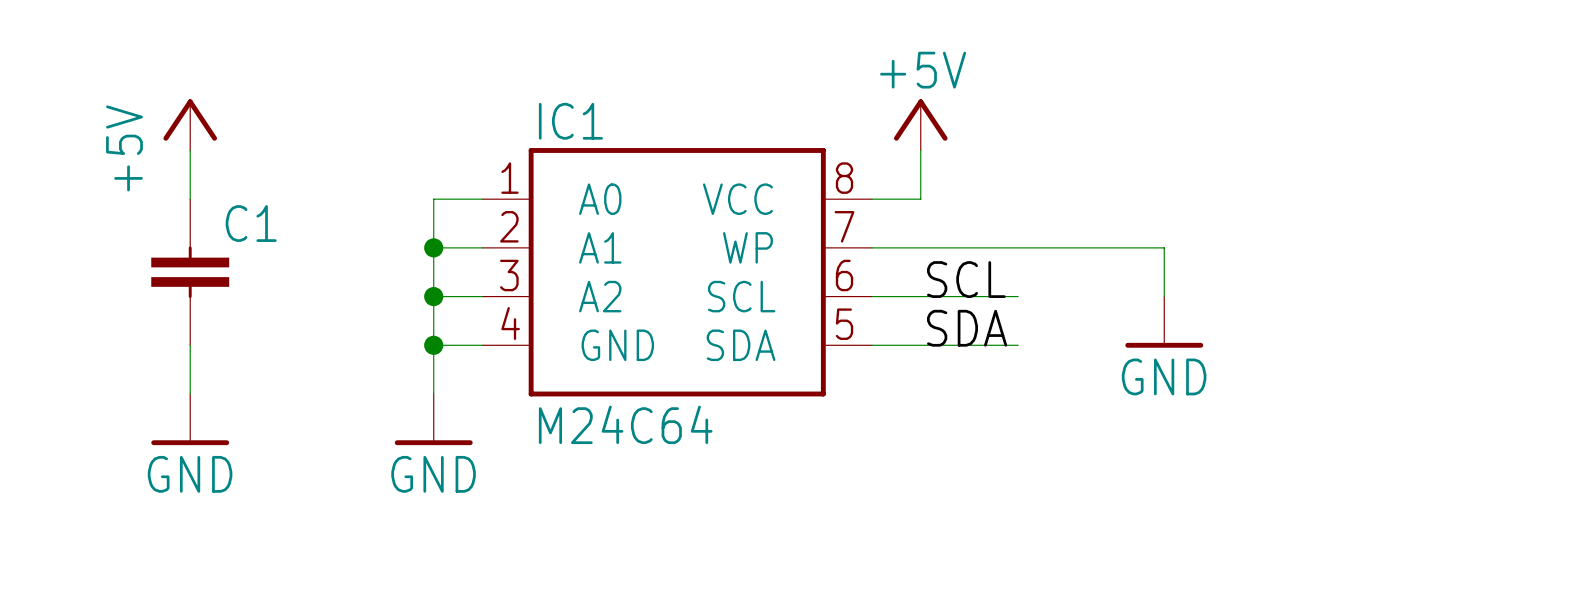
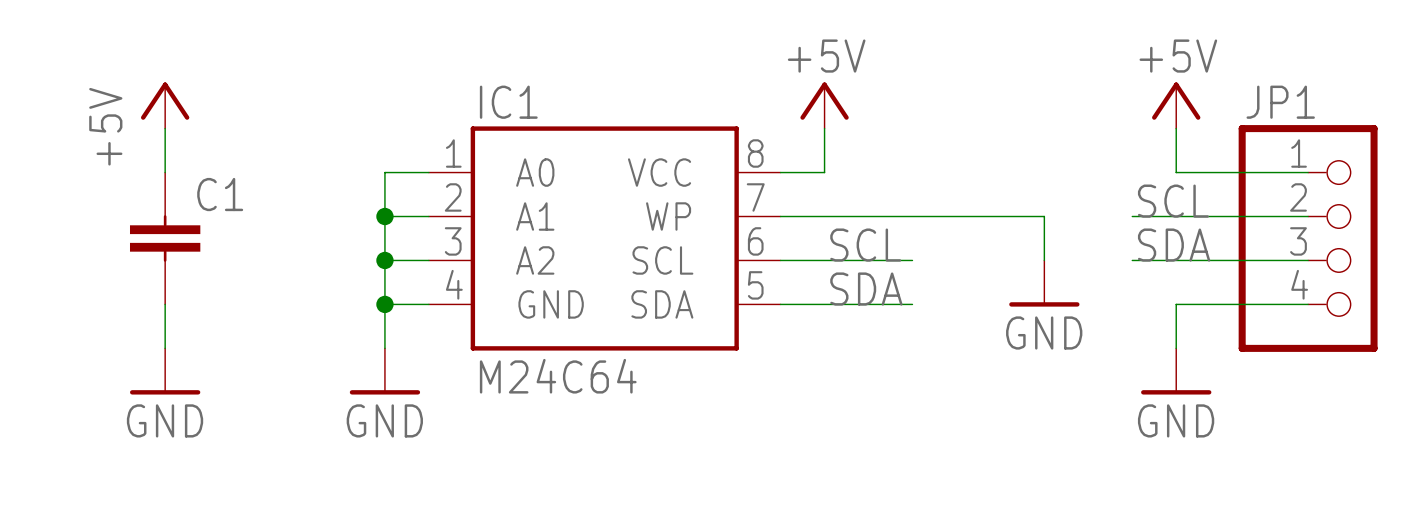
power symbol: none -> +5V (1176, 105)
wire: none -> (1176, 128) (1176, 172) (1308, 172)
label: none -> SCL (1173, 201)
wire: none -> (1132, 216) (1308, 216)
JP1: none -> (1308, 238)
label: none -> SDA (1174, 245)
wire: none -> (1132, 260) (1308, 260)
wire: none -> (1308, 304) (1176, 304) (1176, 348)
power symbol: none -> GND (1176, 371)

